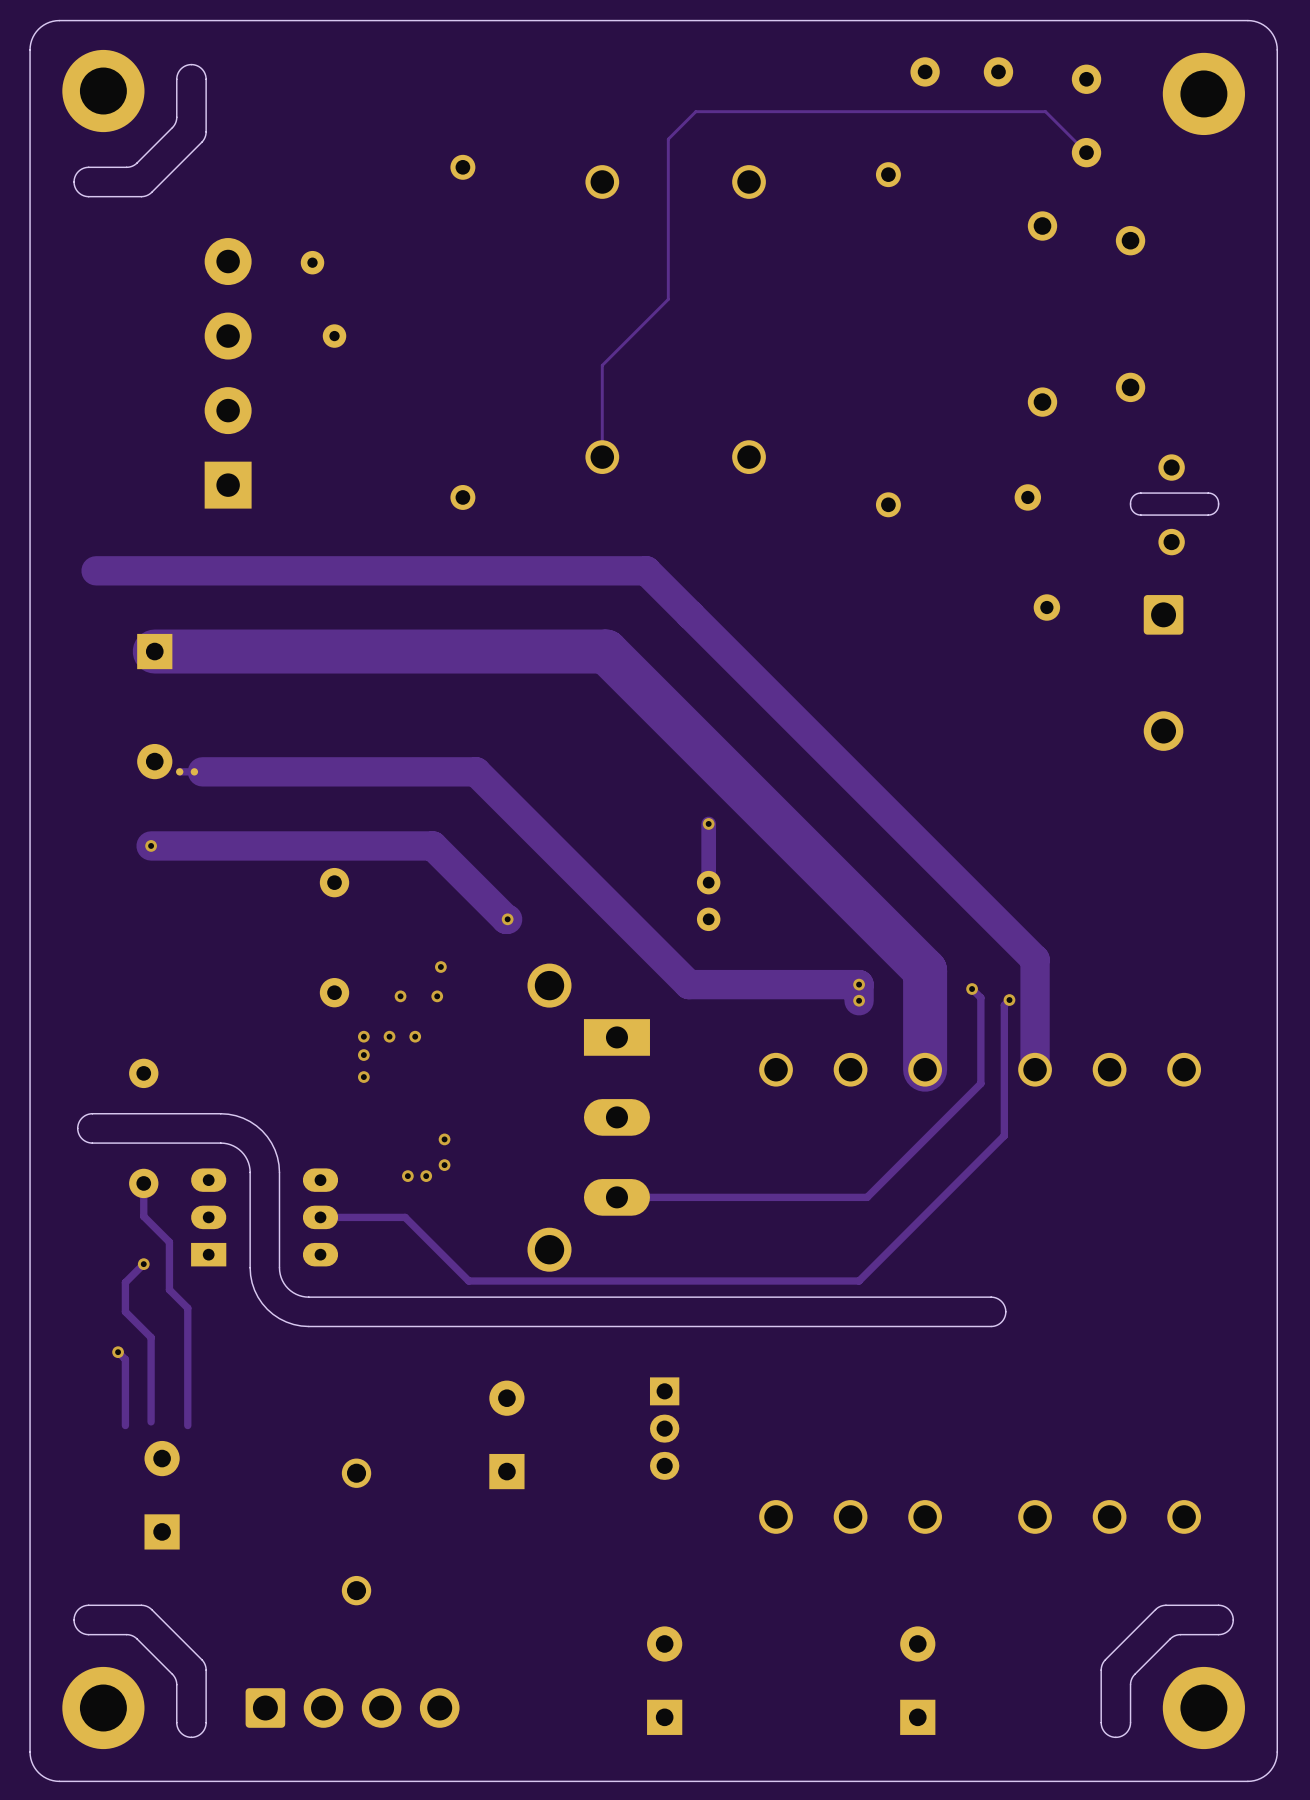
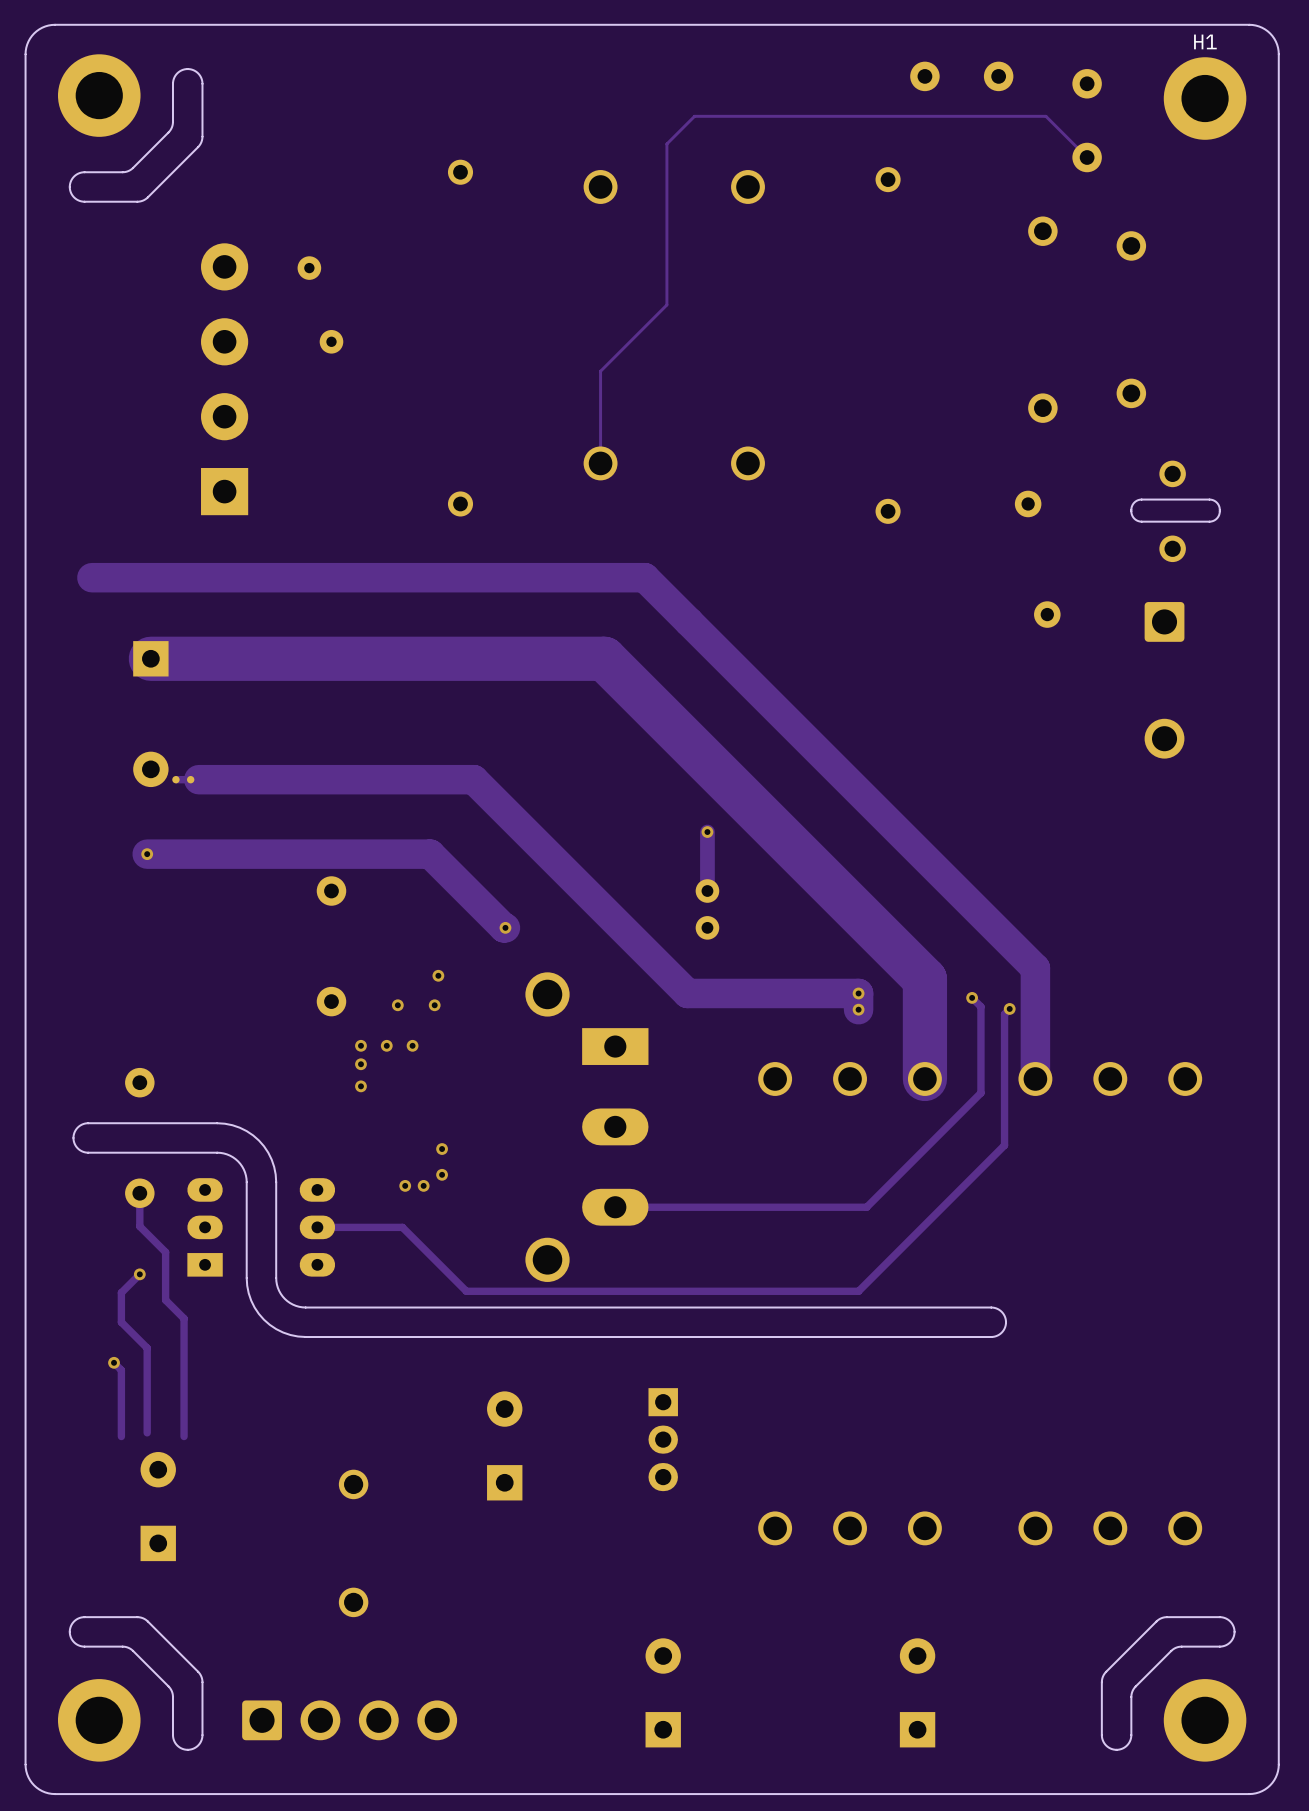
H1 name: none -> H1 (1205, 41)

